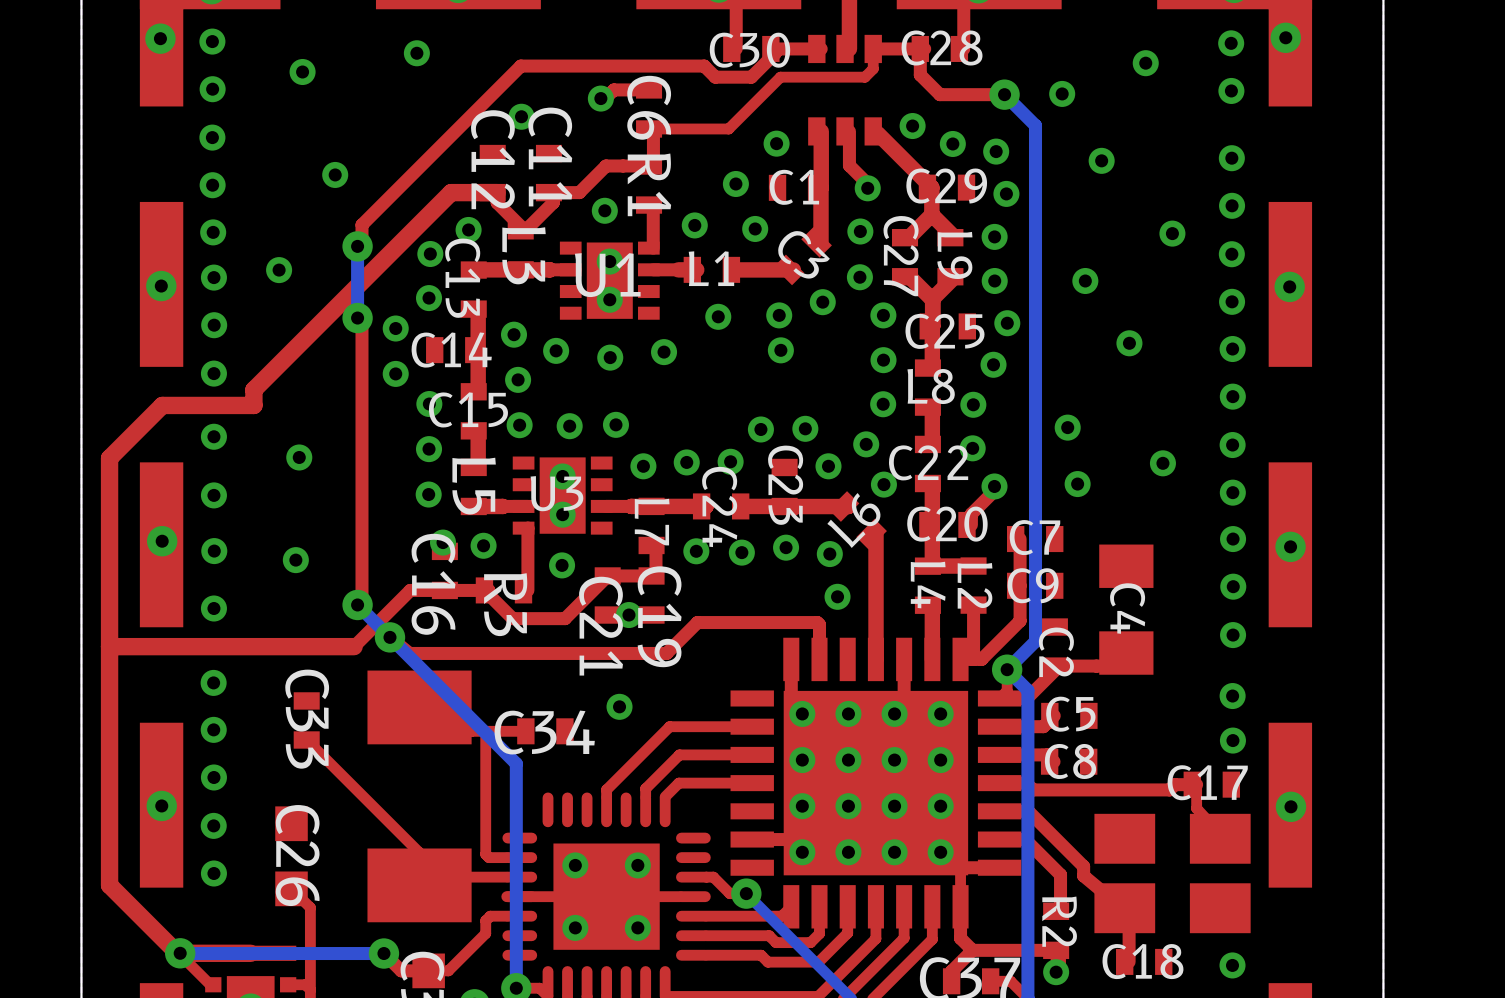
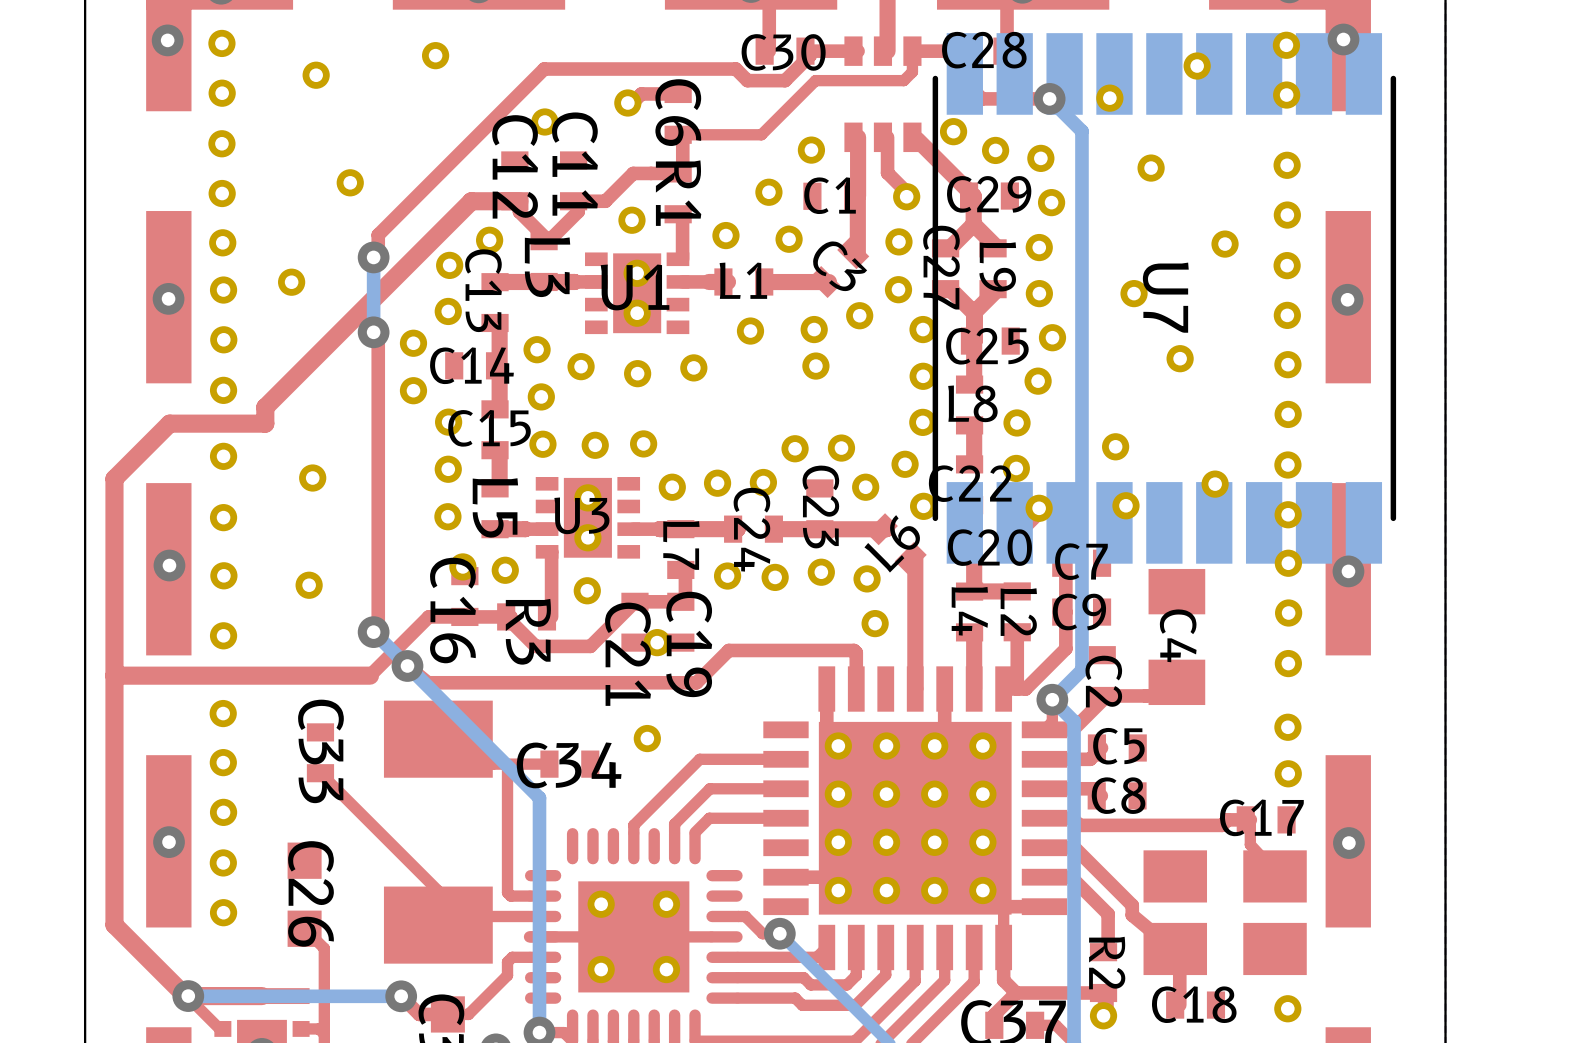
U7: none -> (1164, 298)

